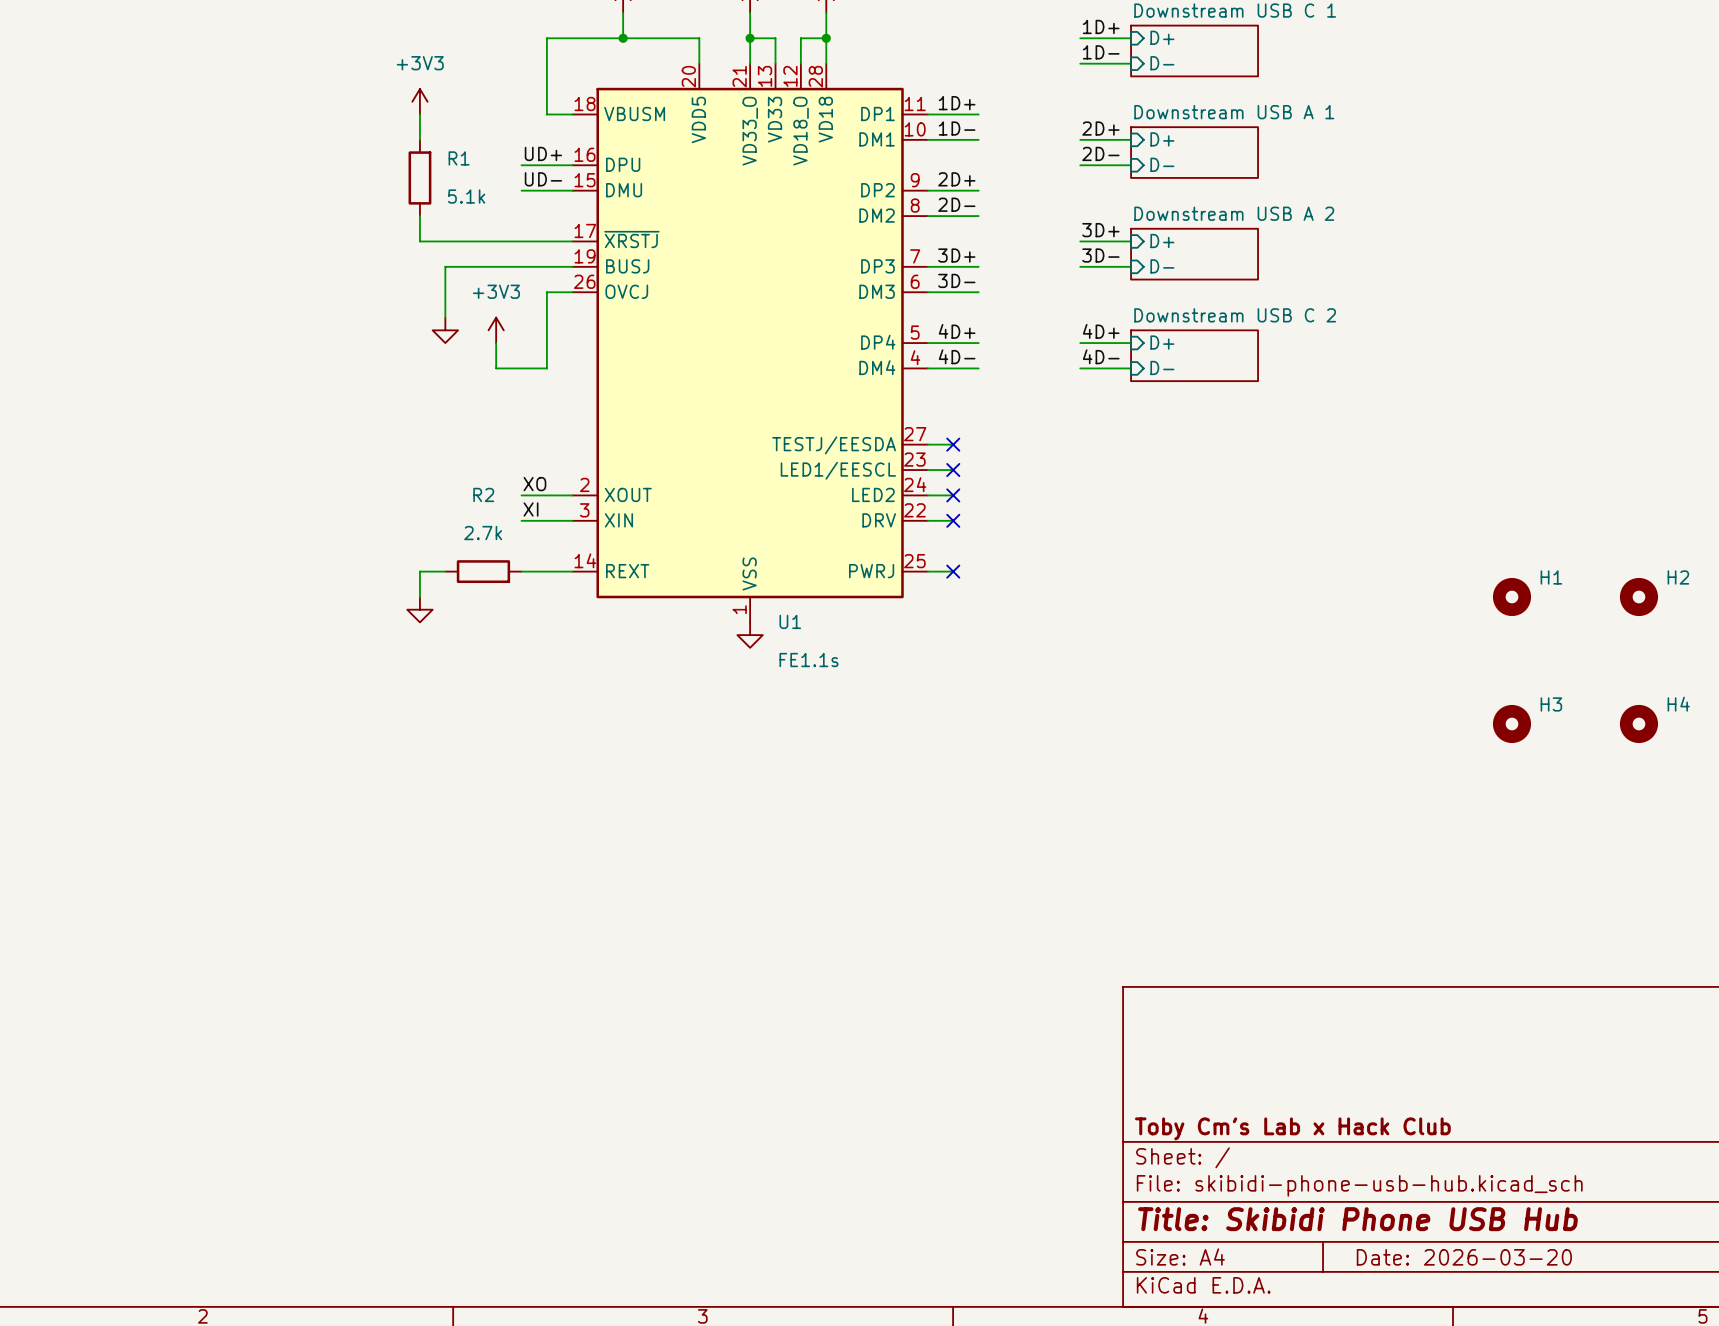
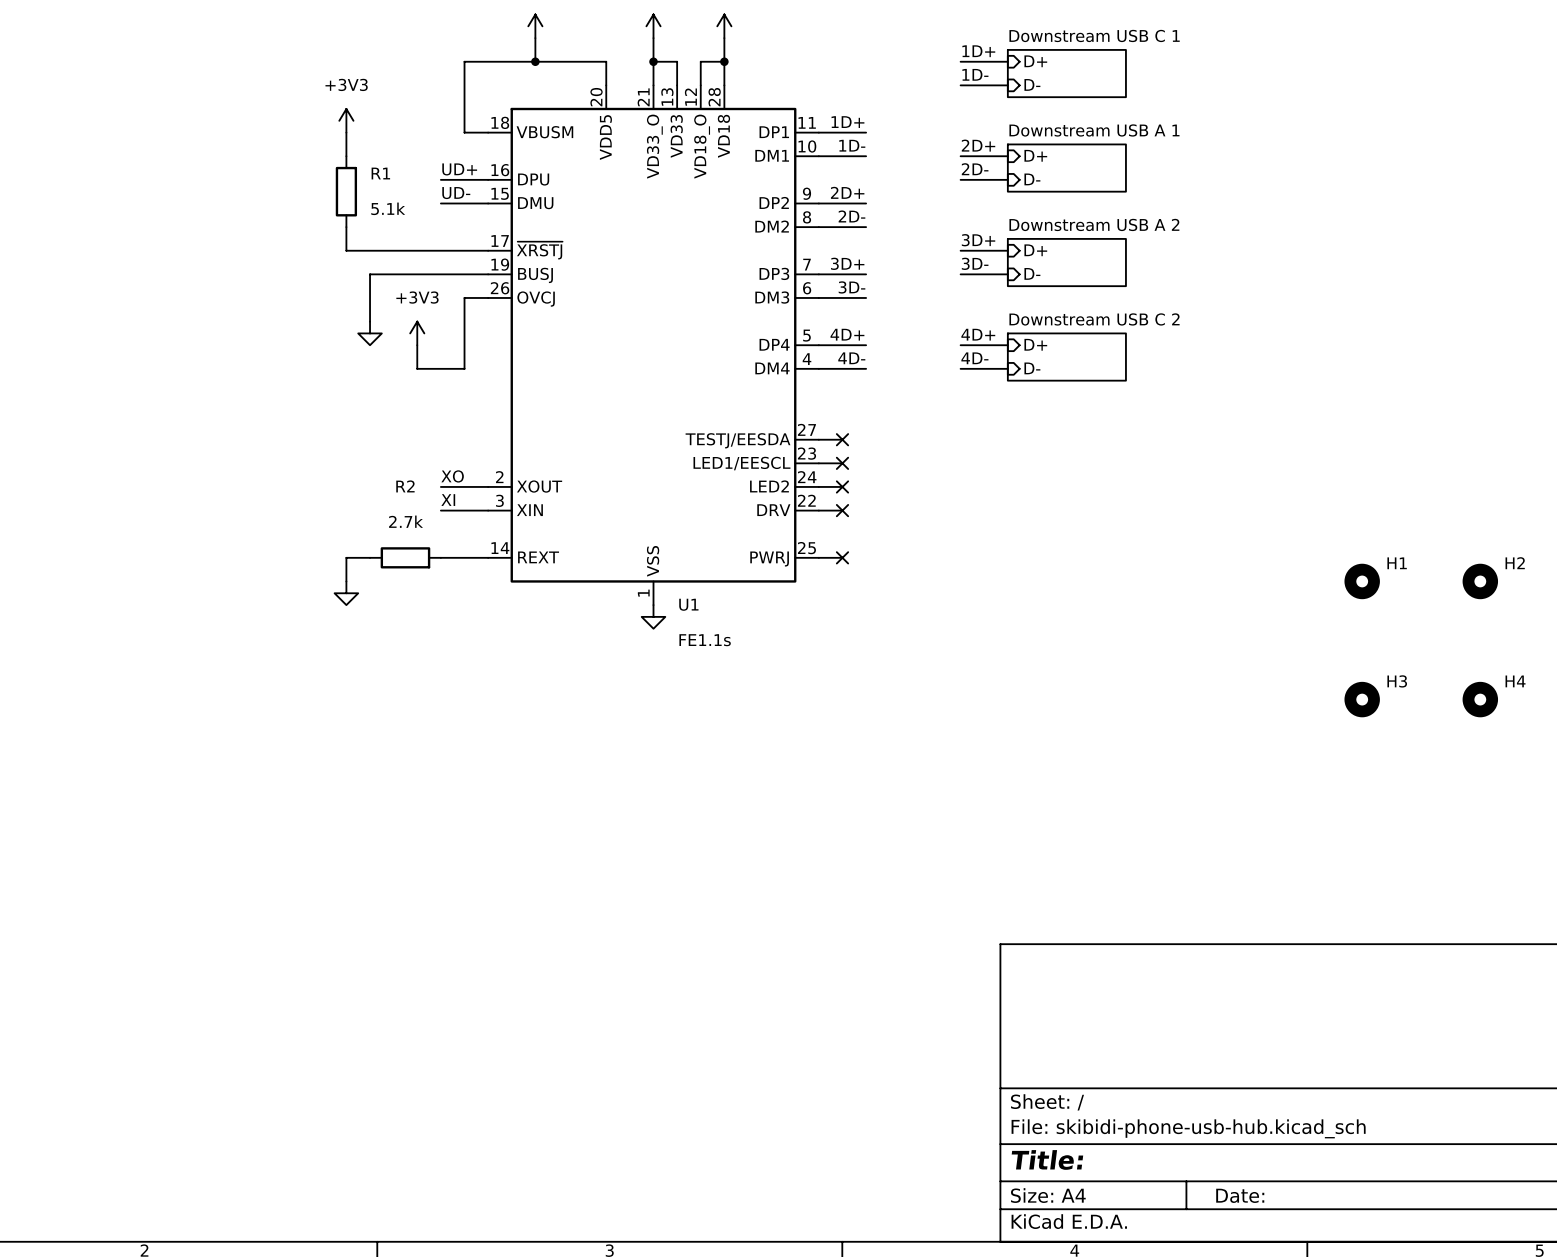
title block: Toby Cm's Lab x Hack Club (1292, 1128) -> none
title block: Title: Skibidi Phone USB Hub (1357, 1219) -> Title: (1047, 1159)
title block: Date: 2026-03-20 (1464, 1257) -> Date: (1240, 1195)

